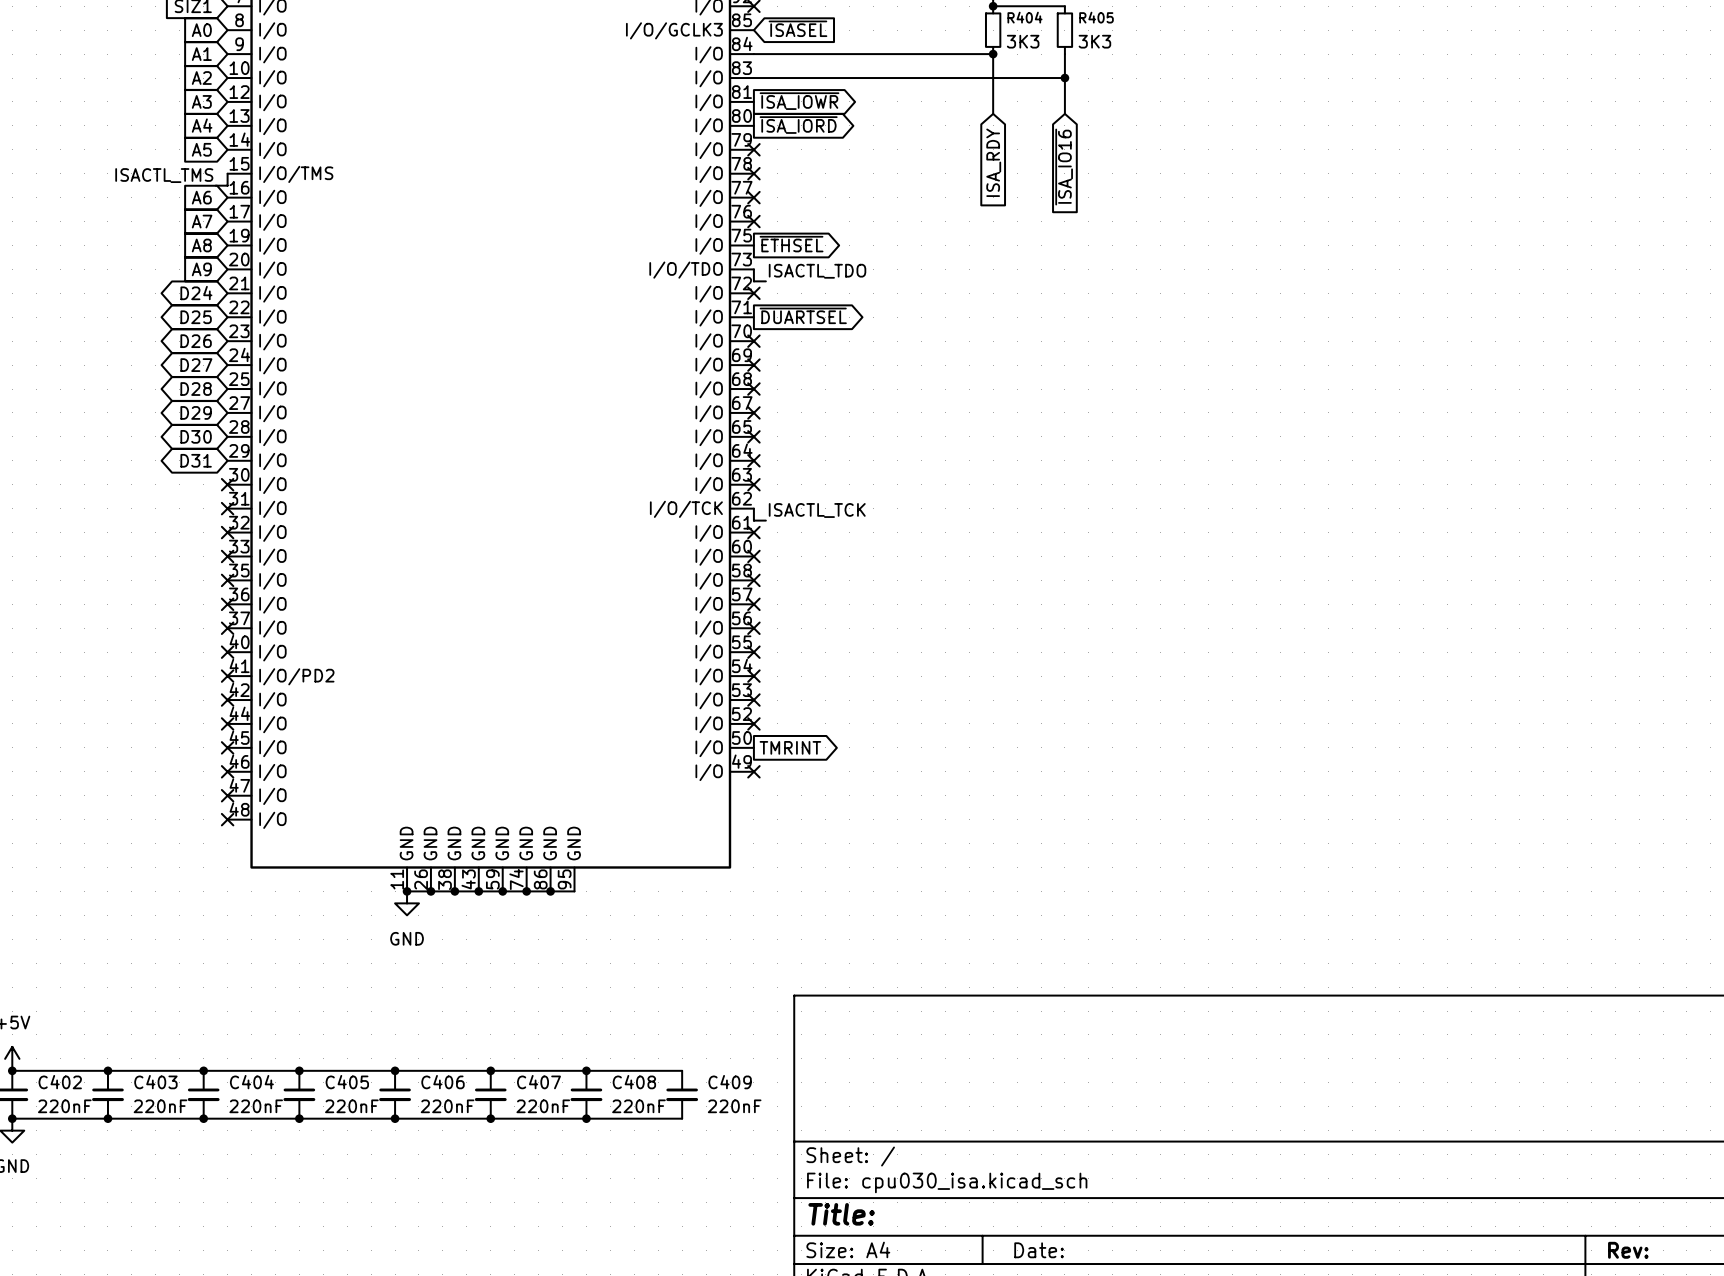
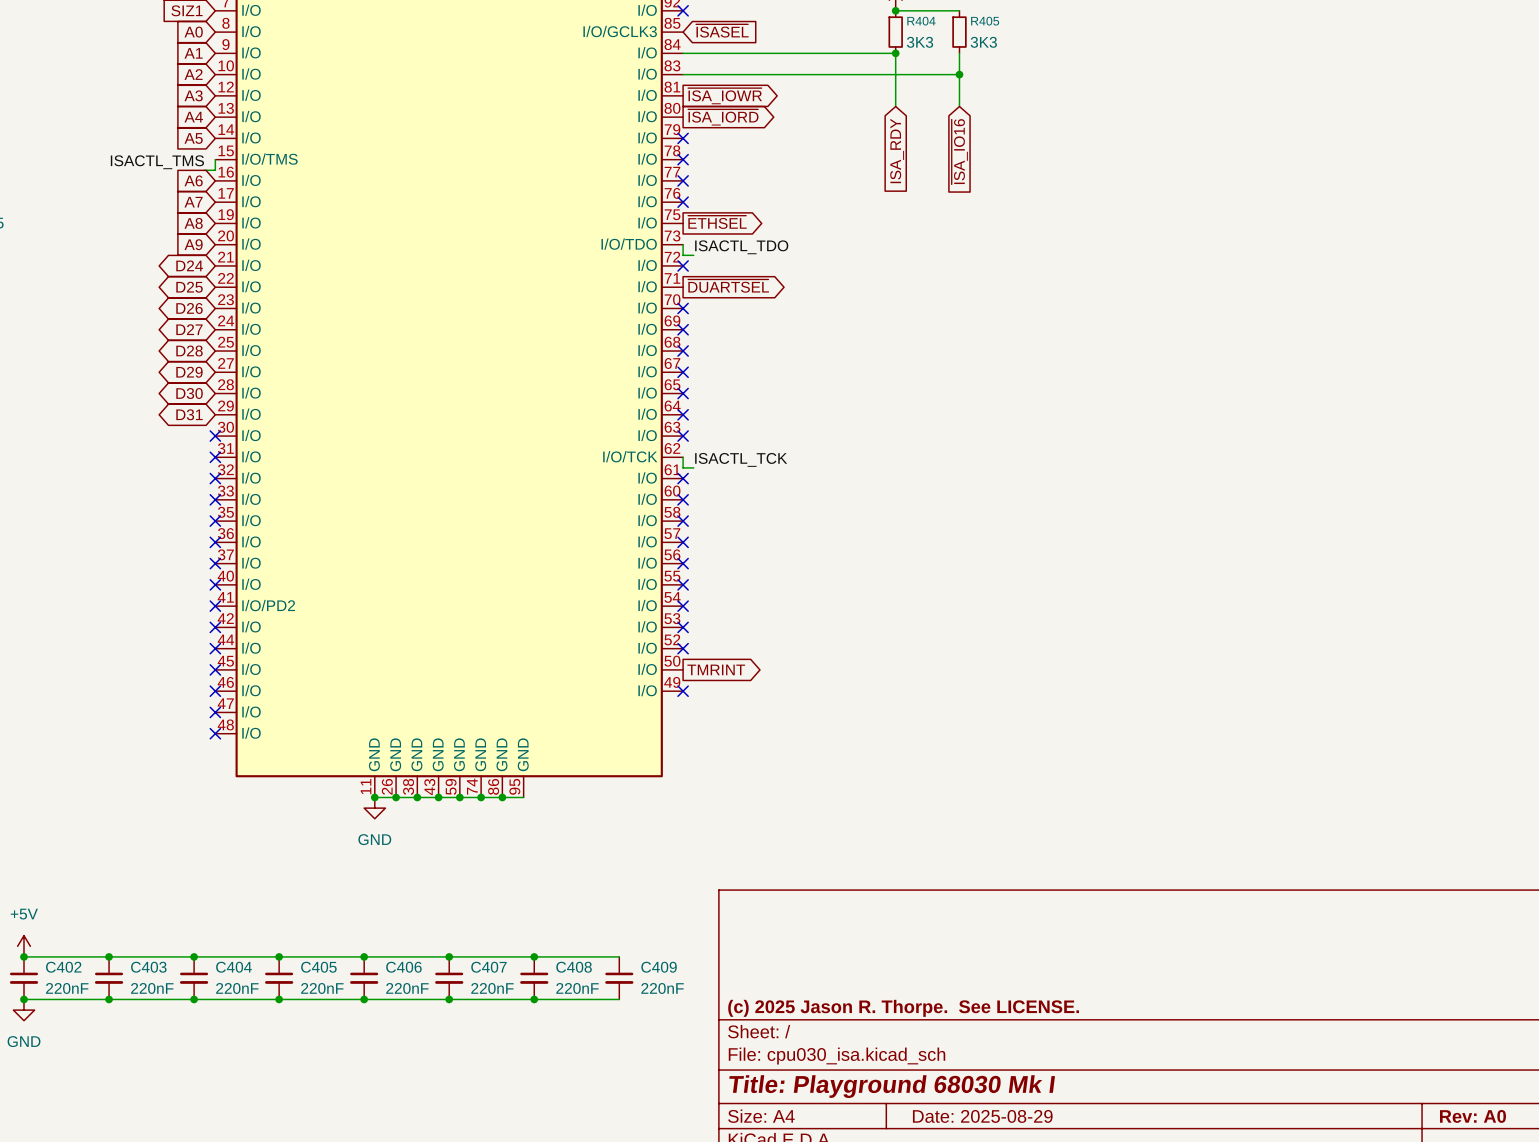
title block: none -> (c) 2025 Jason R. Thorpe. See LICENSE. (903, 1008)
title block: Title: (841, 1214) -> Title: Playground 68030 Mk I (892, 1086)
title block: Date: (1039, 1250) -> Date: 2025-08-29 (982, 1116)
title block: Rev: (1628, 1250) -> Rev: A0 (1472, 1116)

